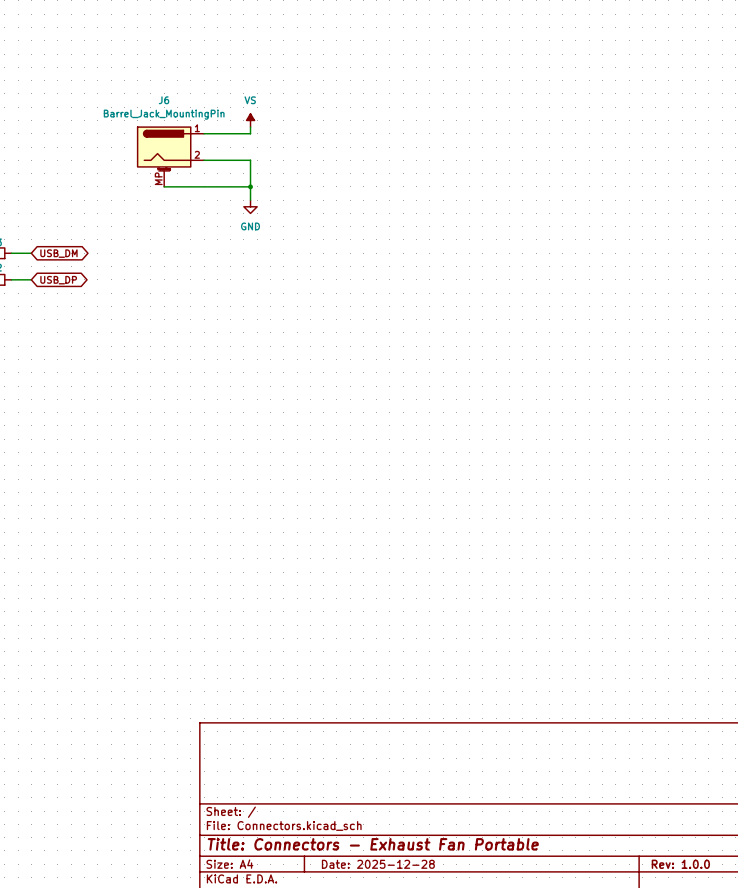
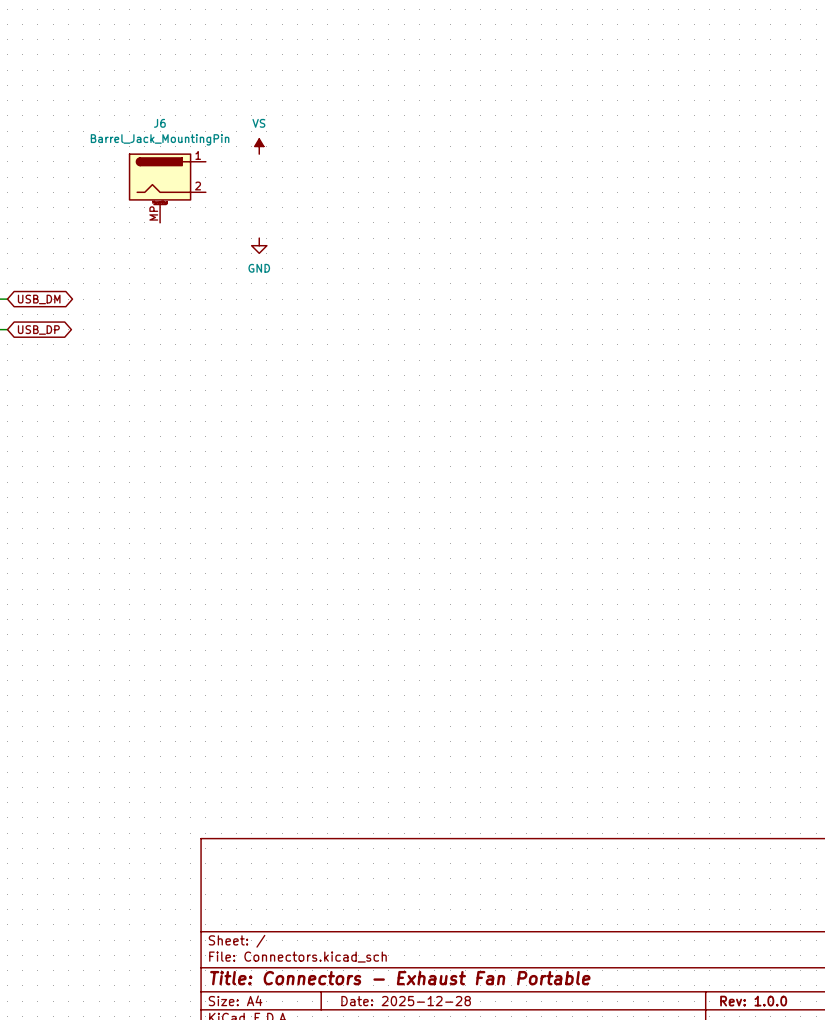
wire: (250, 127) (250, 133) (204, 133) -> none
wire: (204, 160) (250, 160) (250, 200) -> none
wire: (164, 186) (250, 186) -> none
junction: (250, 186) -> none

